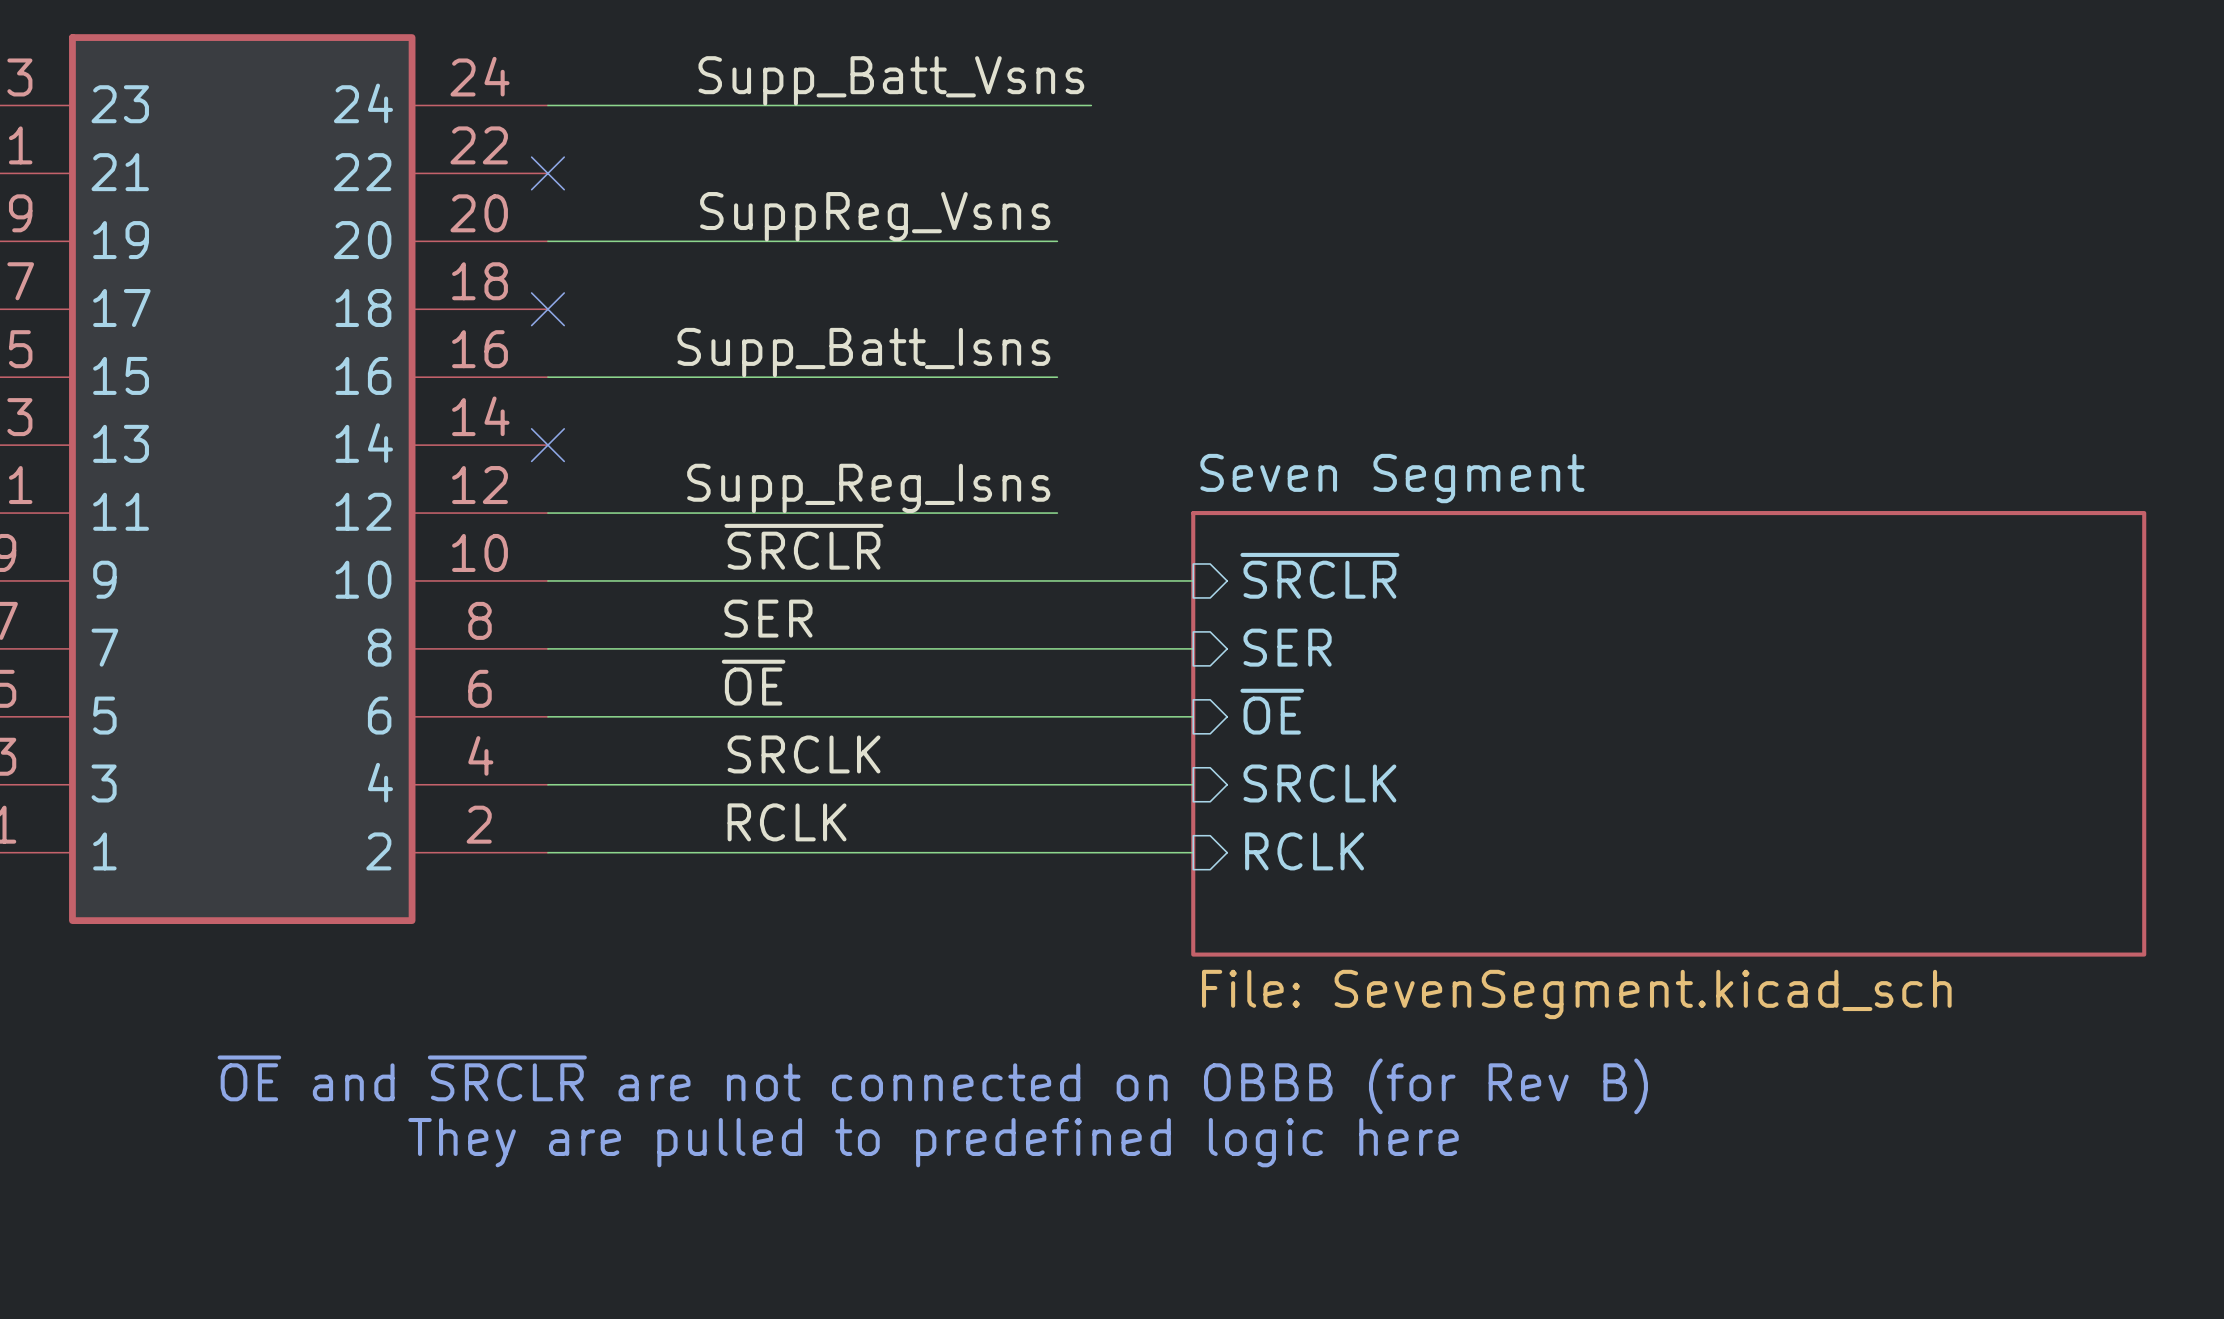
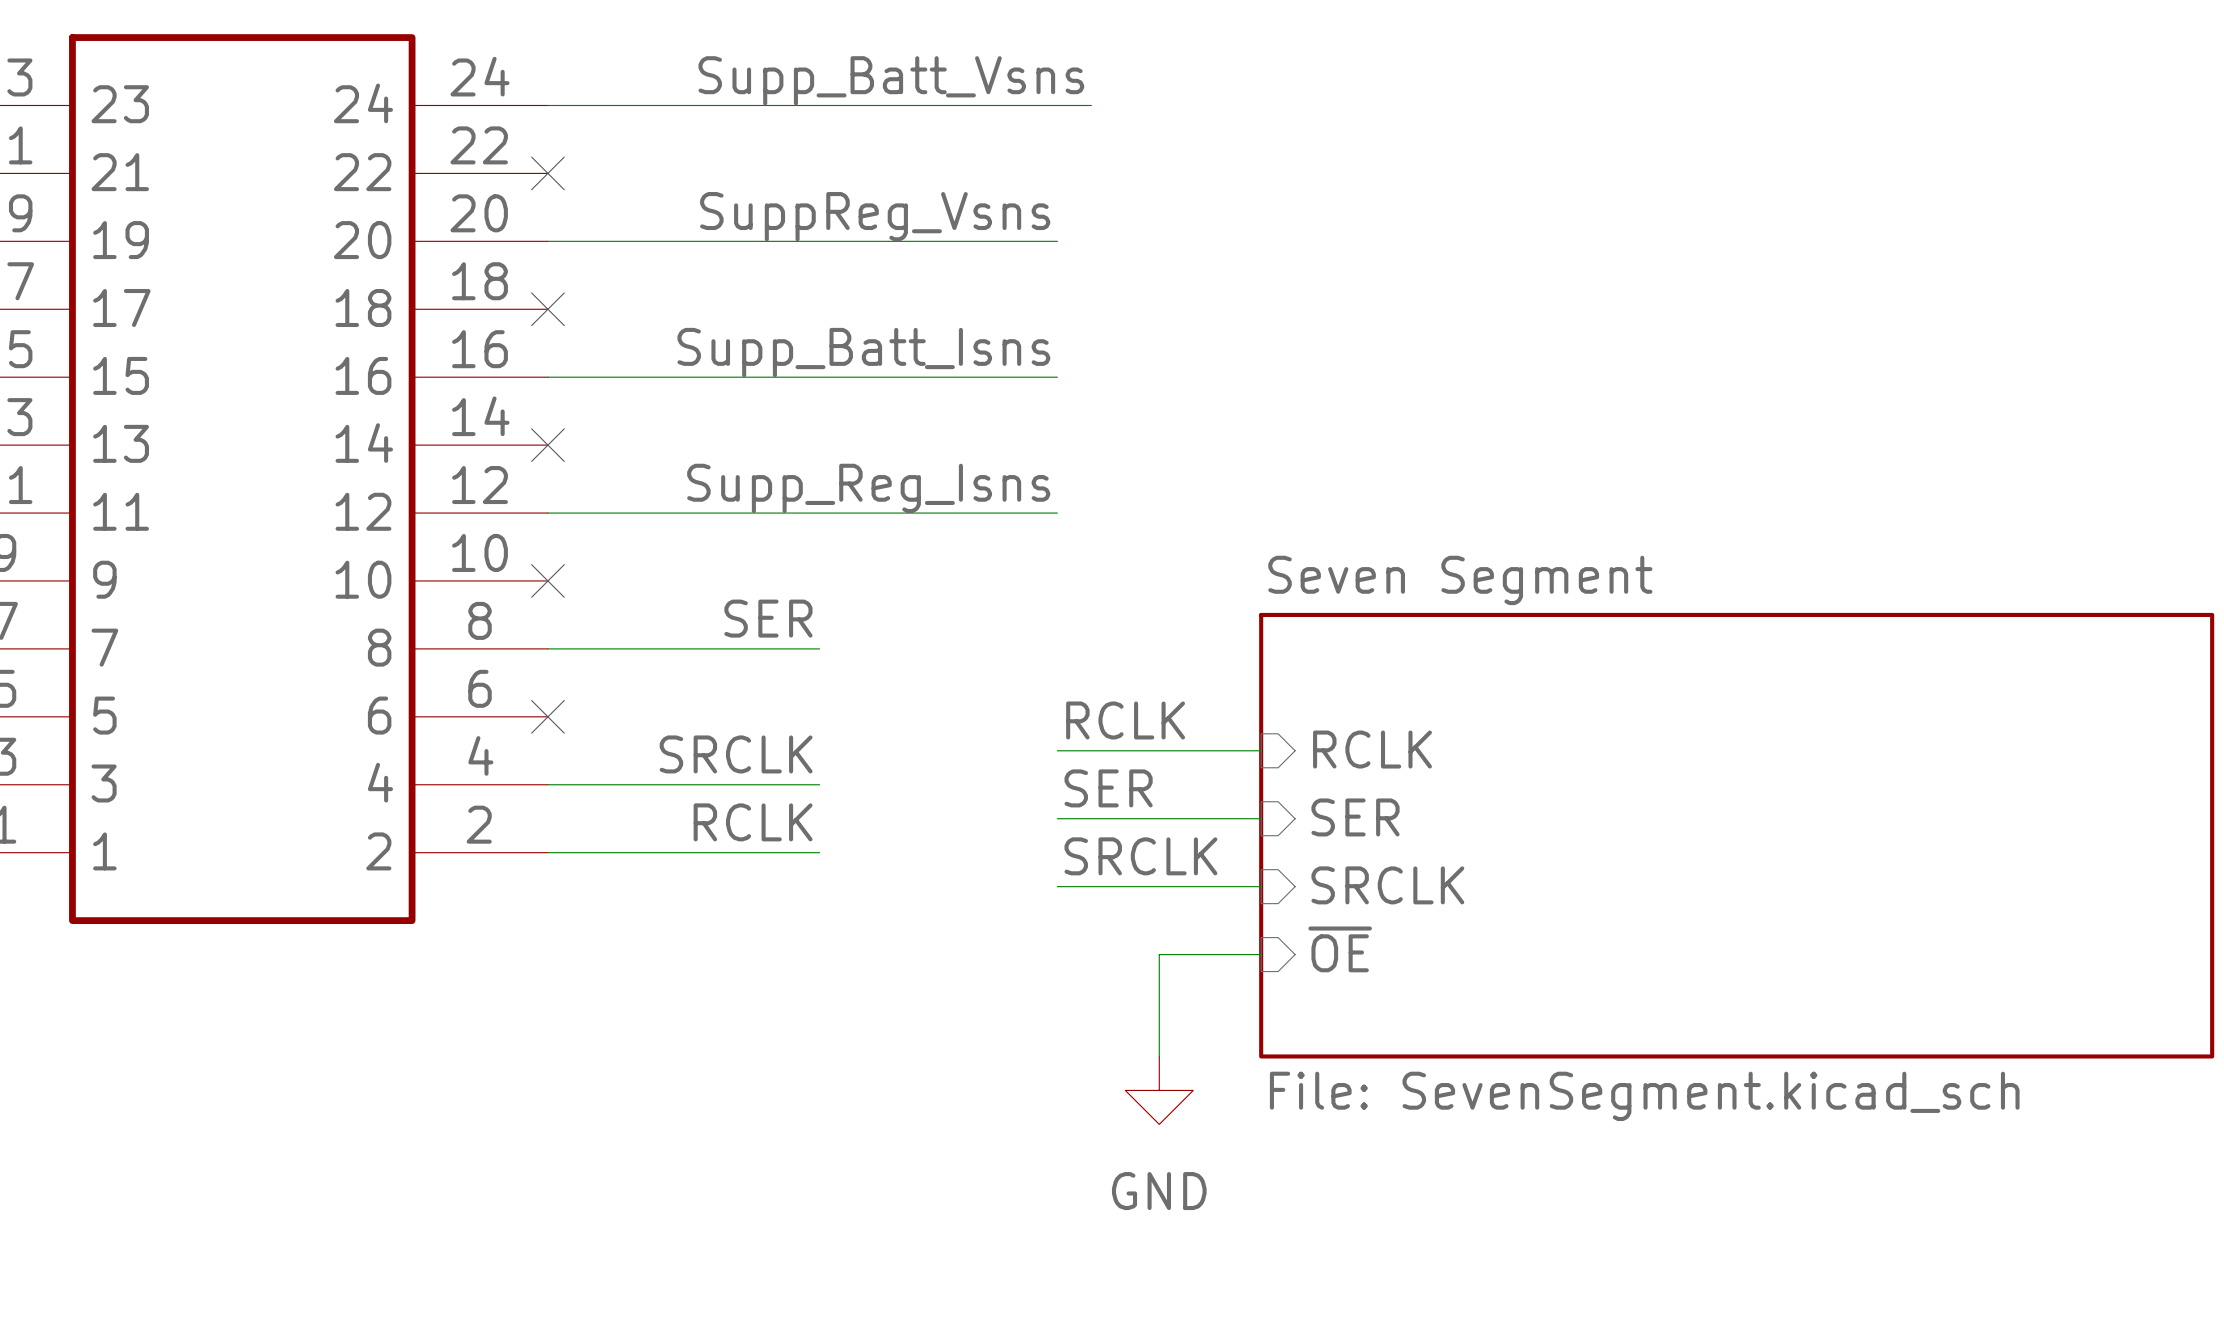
label: ~{SRCLR} (804, 546) -> none
sheet pin: ~{SRCLR} (1319, 575) -> none
wire: (547, 580) (1193, 580) -> none
no-connect mark: none -> (547, 580)
sheet pin position: SER (1287, 647) -> SER (1355, 817)
wire: (819, 648) (1193, 648) -> none
label: ~{OE} (753, 682) -> none
sheet pin position: ~{OE} (1272, 711) -> ~{OE} (1340, 949)
wire: (547, 716) (1193, 716) -> none
no-connect mark: none -> (547, 716)
label: none -> RCLK (1125, 720)
sheet Seven Segment position: (1668, 733) -> (1736, 835)
wire: none -> (1057, 750) (1261, 750)
label position: SRCLK (804, 754) -> SRCLK (736, 754)
sheet pin position: SRCLK (1319, 783) -> SRCLK (1387, 885)
wire: (819, 784) (1193, 784) -> none
label: none -> SER (1108, 788)
wire: none -> (1057, 818) (1261, 818)
label position: RCLK (787, 822) -> RCLK (753, 822)
sheet pin position: RCLK (1304, 851) -> RCLK (1372, 749)
wire: (819, 852) (1193, 852) -> none
label: none -> SRCLK (1140, 856)
wire: none -> (1057, 886) (1261, 886)
wire: none -> (1261, 954) (1159, 954) (1159, 1056)
text: ~{OE} and ~{SRCLR} are not connected on OBBB (for Rev B) (932, 1084) -> none
power symbol: none -> GND (1159, 1090)
text: They are pulled to predefined logic here (933, 1142) -> none

